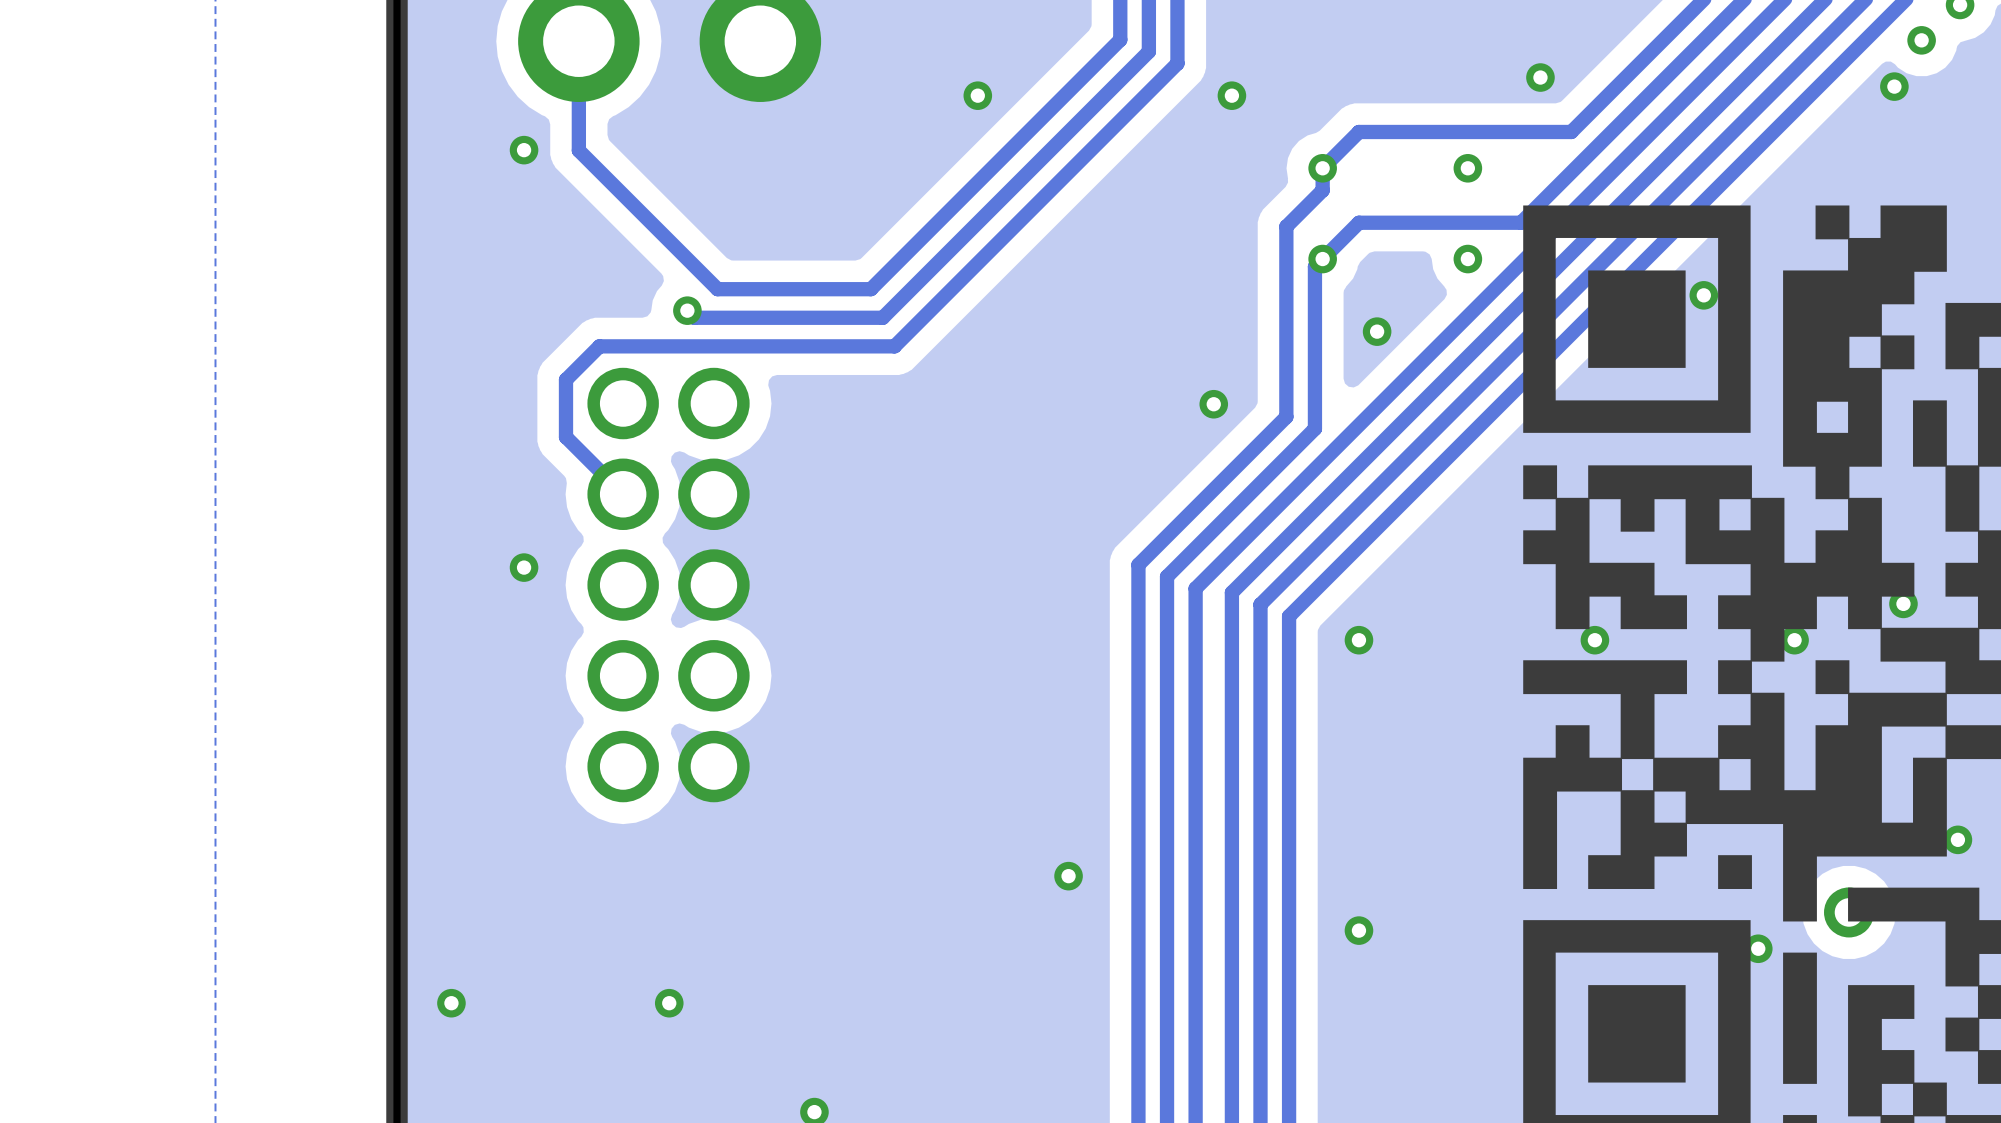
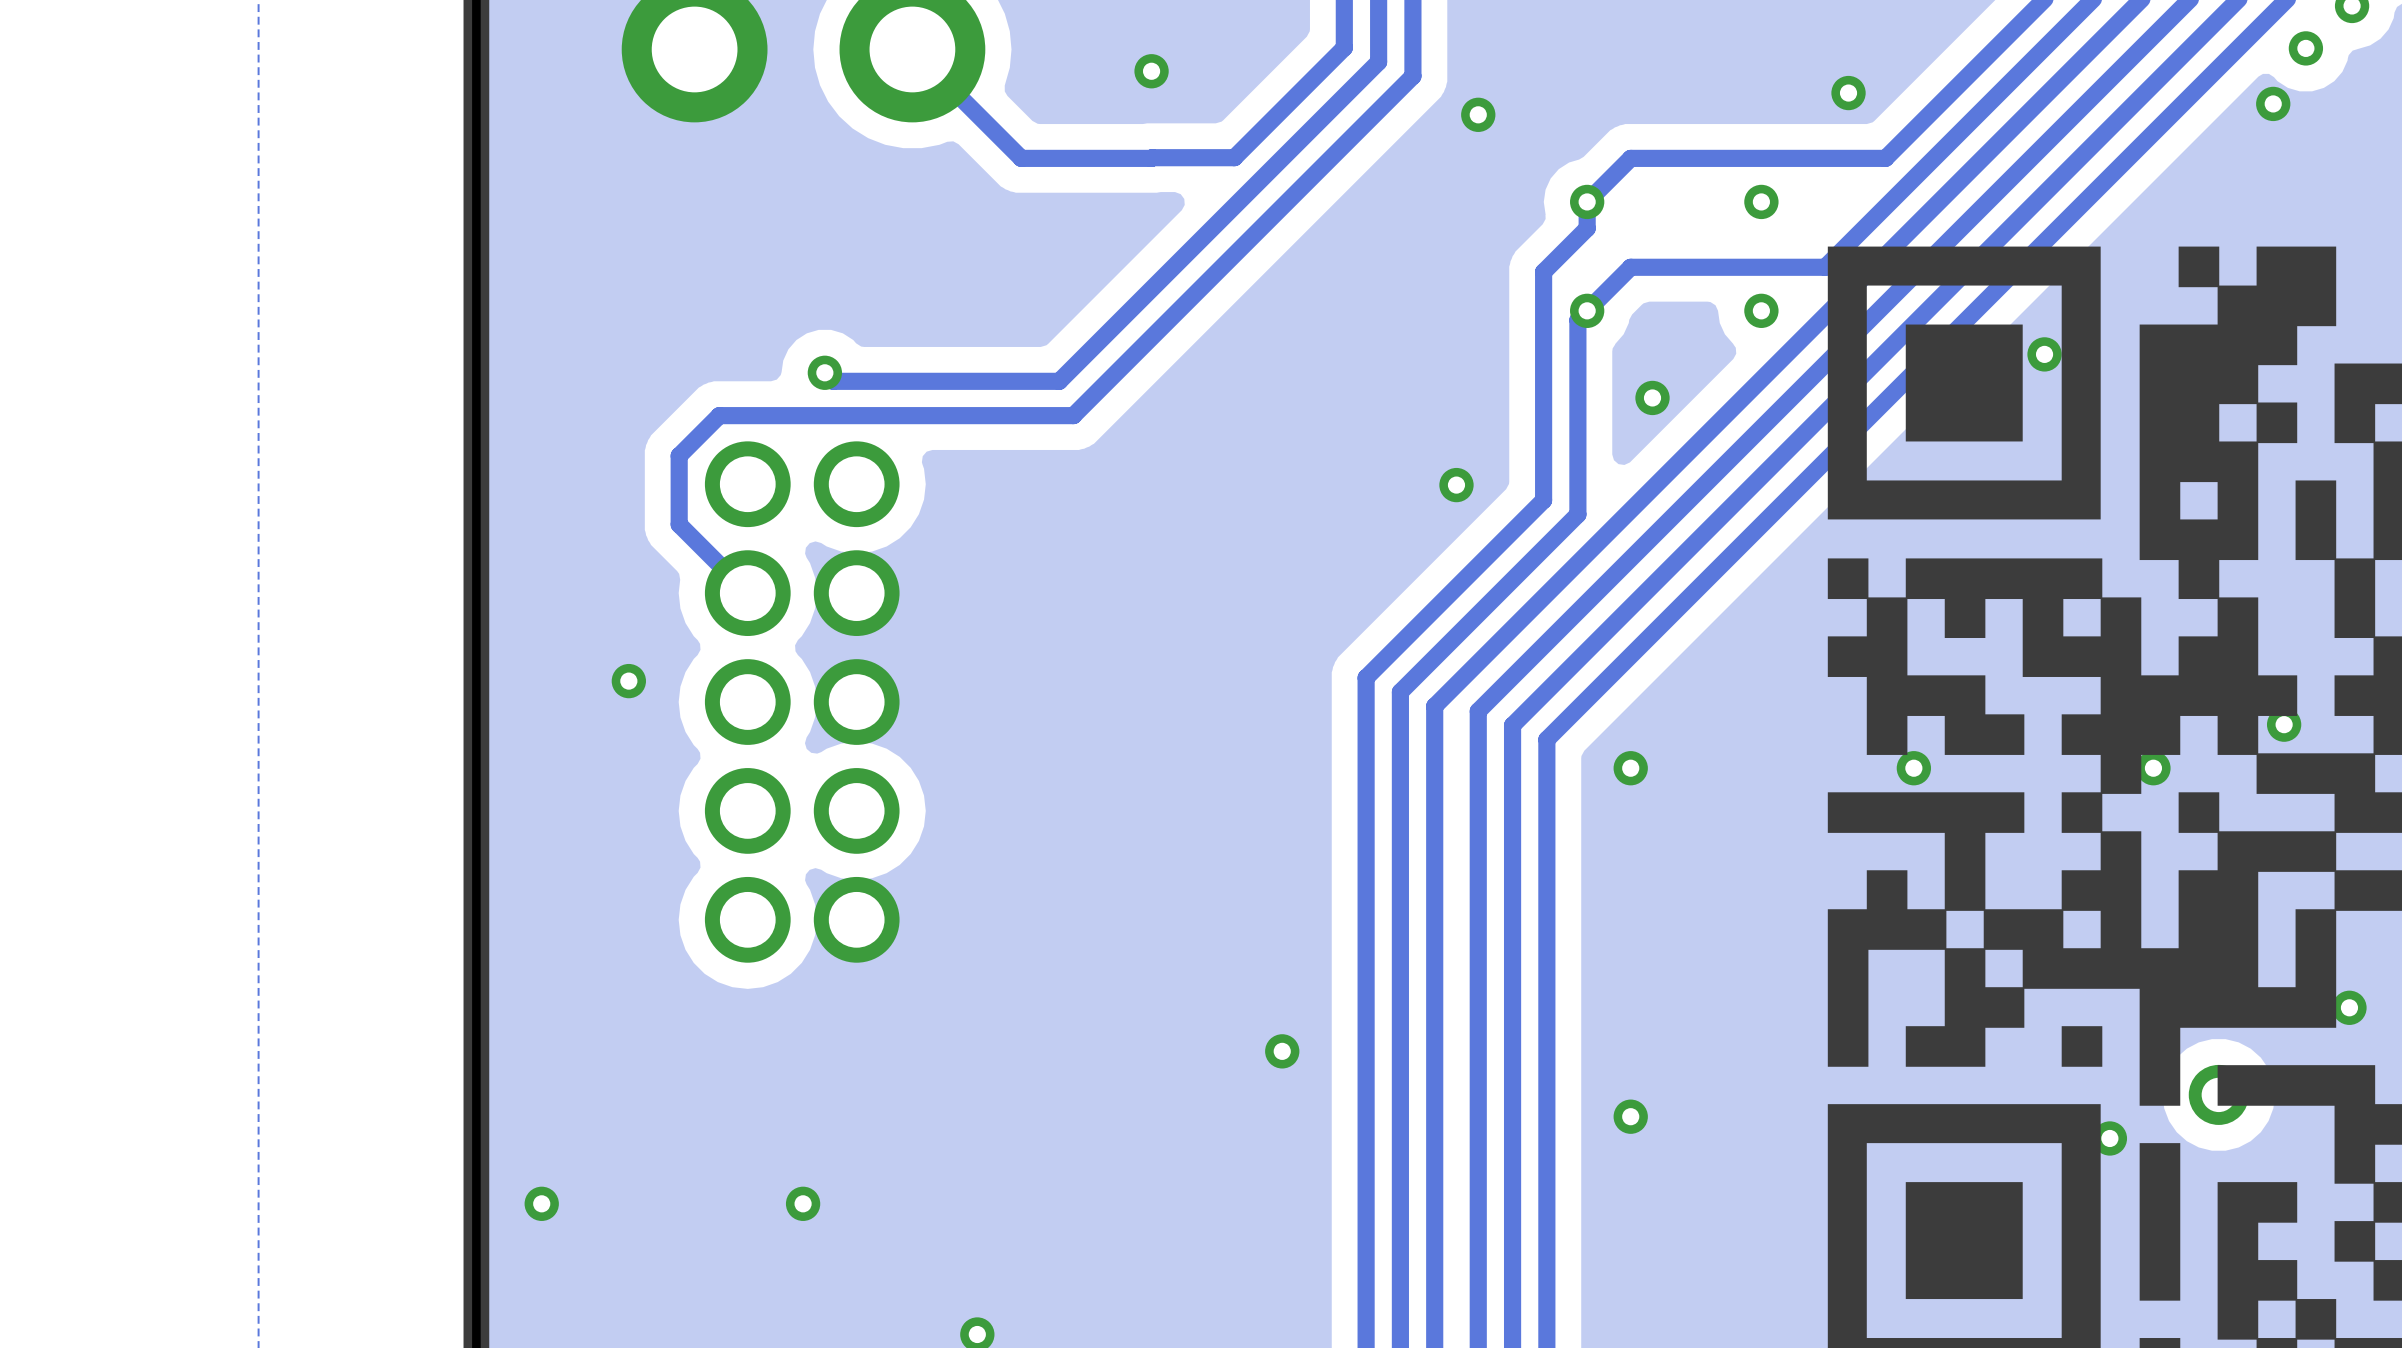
track: (578, 41) (578, 150) (717, 289) (870, 289) (1028, 131) -> (1152, 157) (1234, 157)
track: none -> (912, 49) (1021, 158) (1151, 158)
via position: (977, 95) -> (1151, 71)
via: (524, 150) -> none

